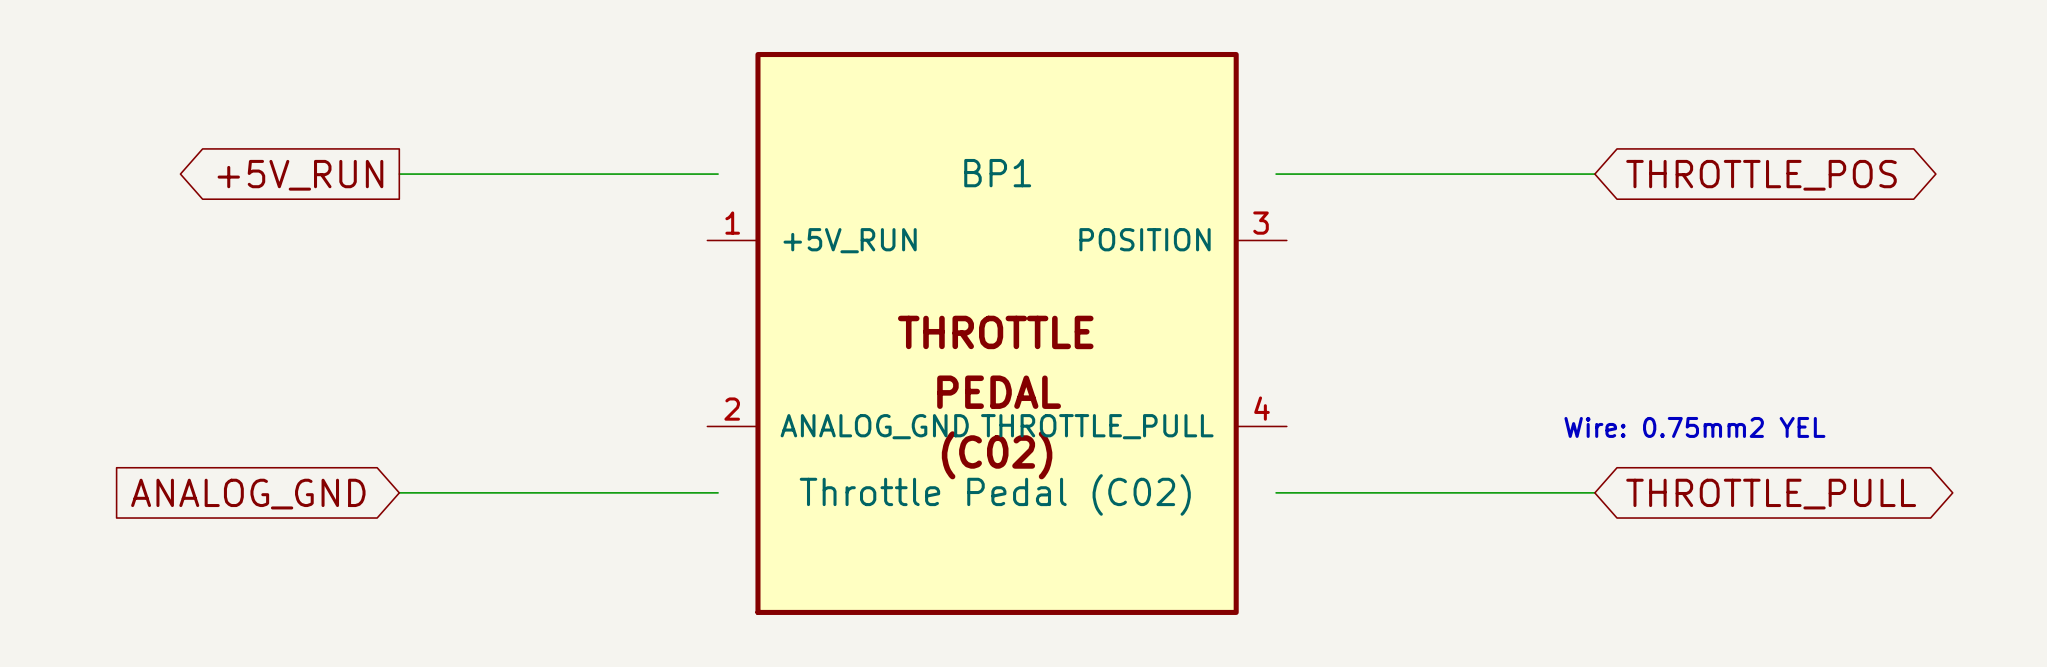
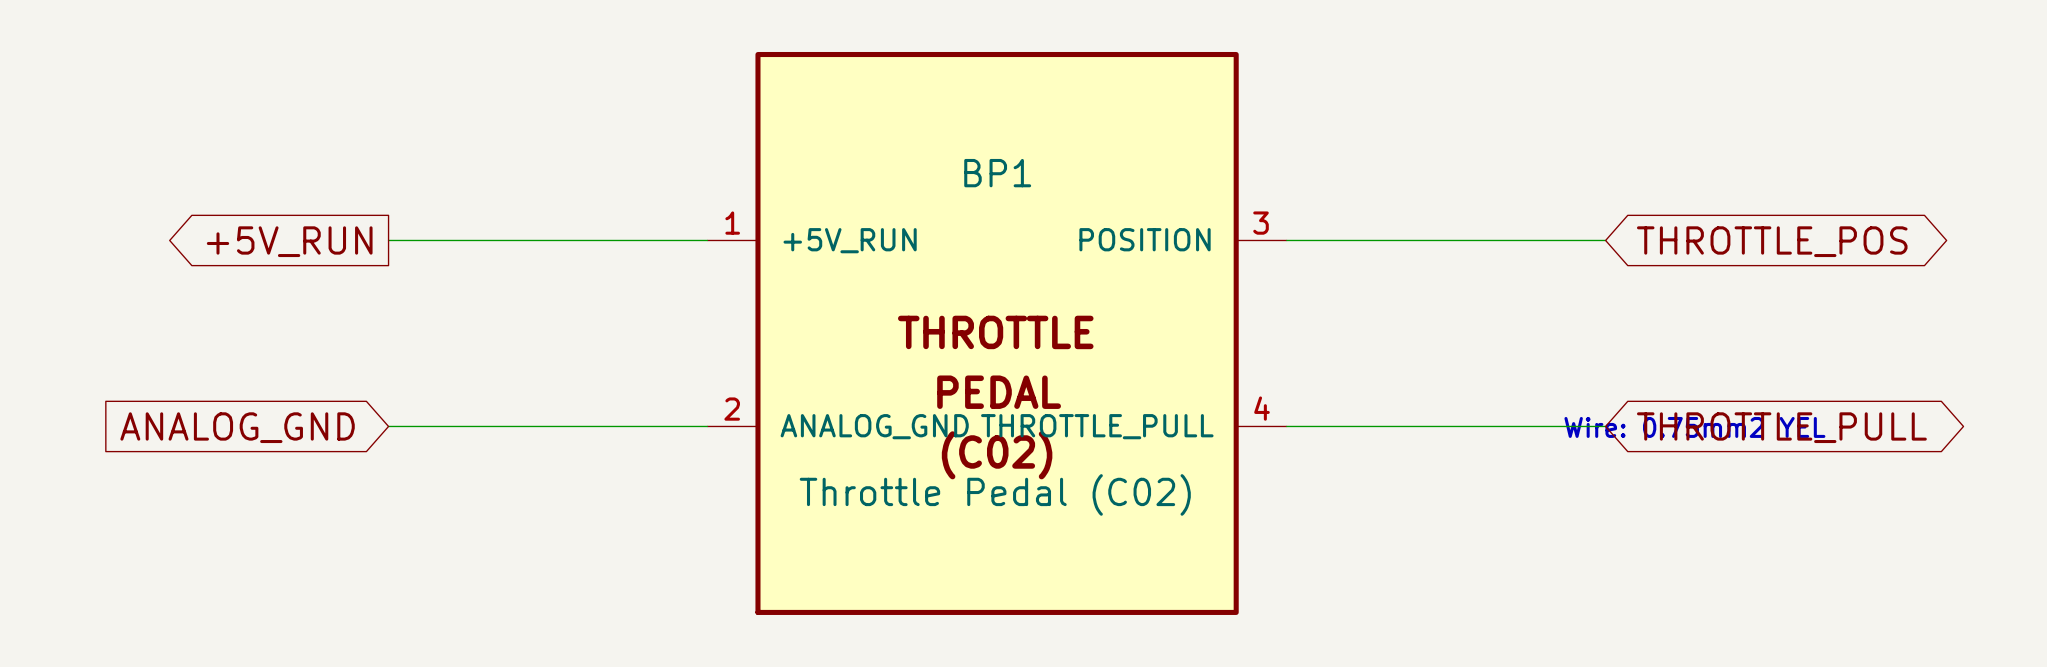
wire: (399, 174) (718, 174) -> (388, 240) (707, 240)
wire: (1276, 174) (1594, 174) -> (1286, 240) (1605, 240)
global label position: +5V_RUN (300, 175) -> +5V_RUN (289, 241)
global label position: THROTTLE_POS (1761, 175) -> THROTTLE_POS (1772, 241)
wire: (399, 492) (718, 492) -> (388, 426) (707, 426)
wire: (1276, 492) (1594, 492) -> (1286, 426) (1605, 426)
global label position: ANALOG_GND (248, 494) -> ANALOG_GND (237, 427)
global label position: THROTTLE_PULL (1771, 494) -> THROTTLE_PULL (1781, 427)

